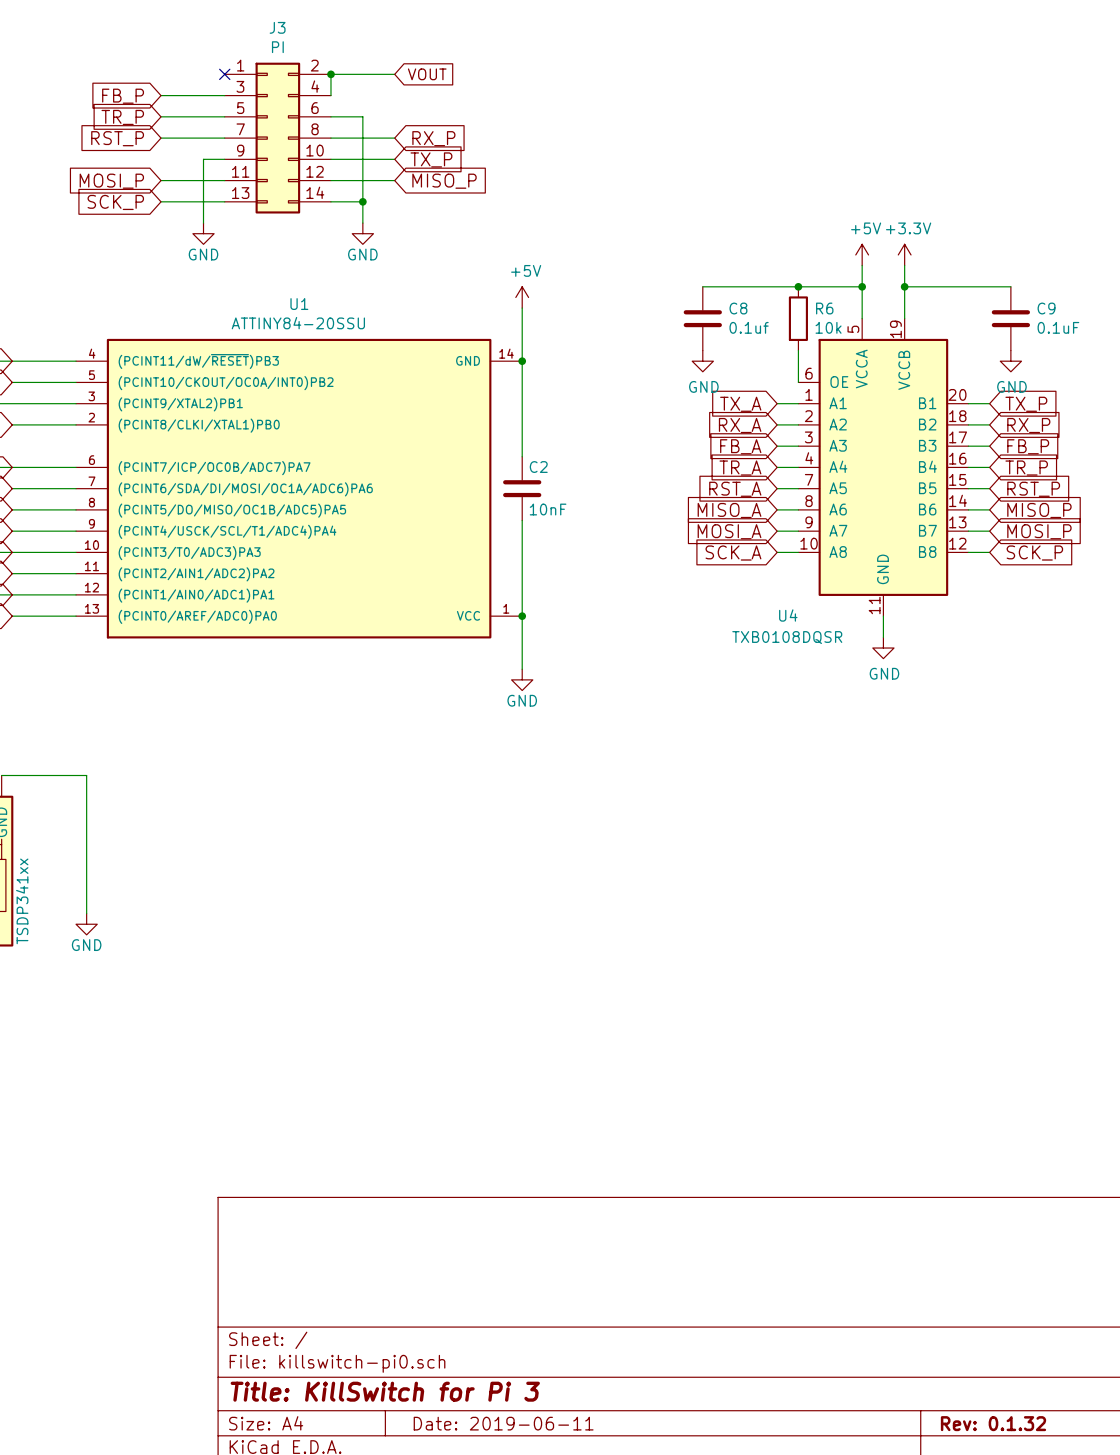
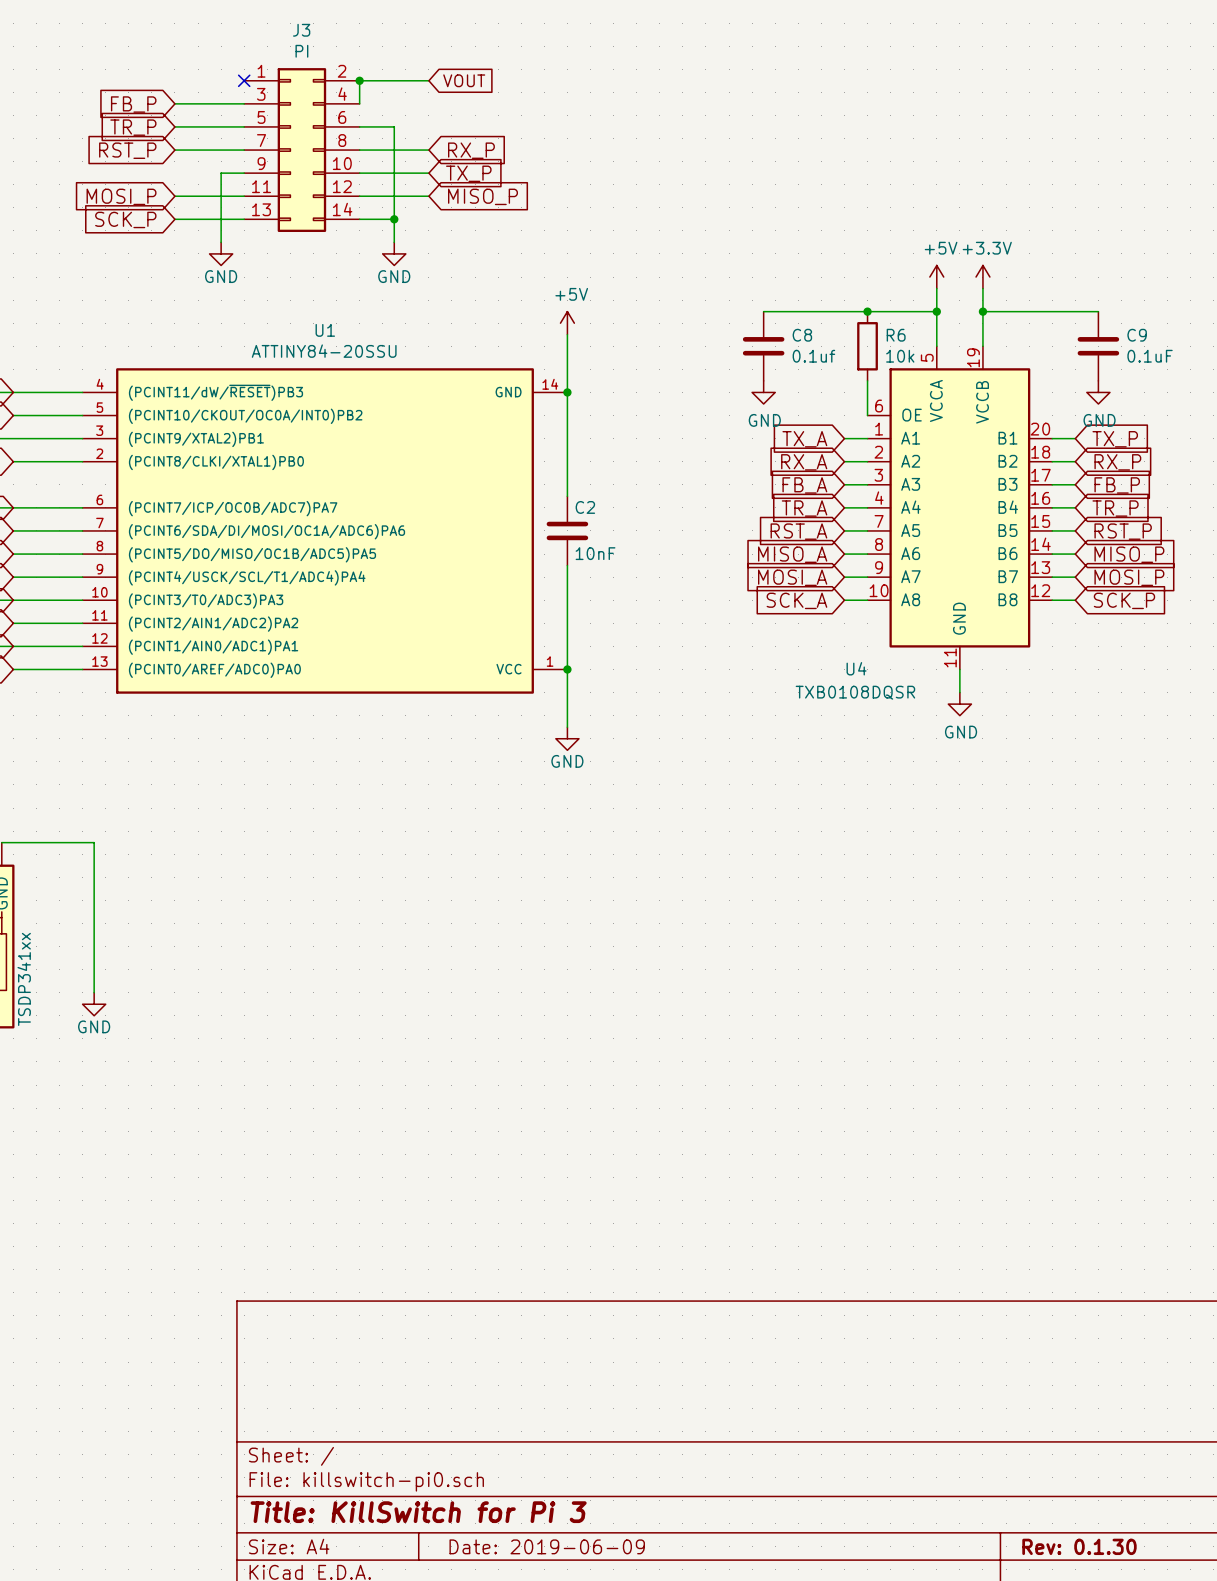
title block: Date: 2019-06-11 (503, 1423) -> Date: 2019-06-09 (547, 1546)
title block: Rev: 0.1.32 (993, 1423) -> Rev: 0.1.30 (1079, 1546)

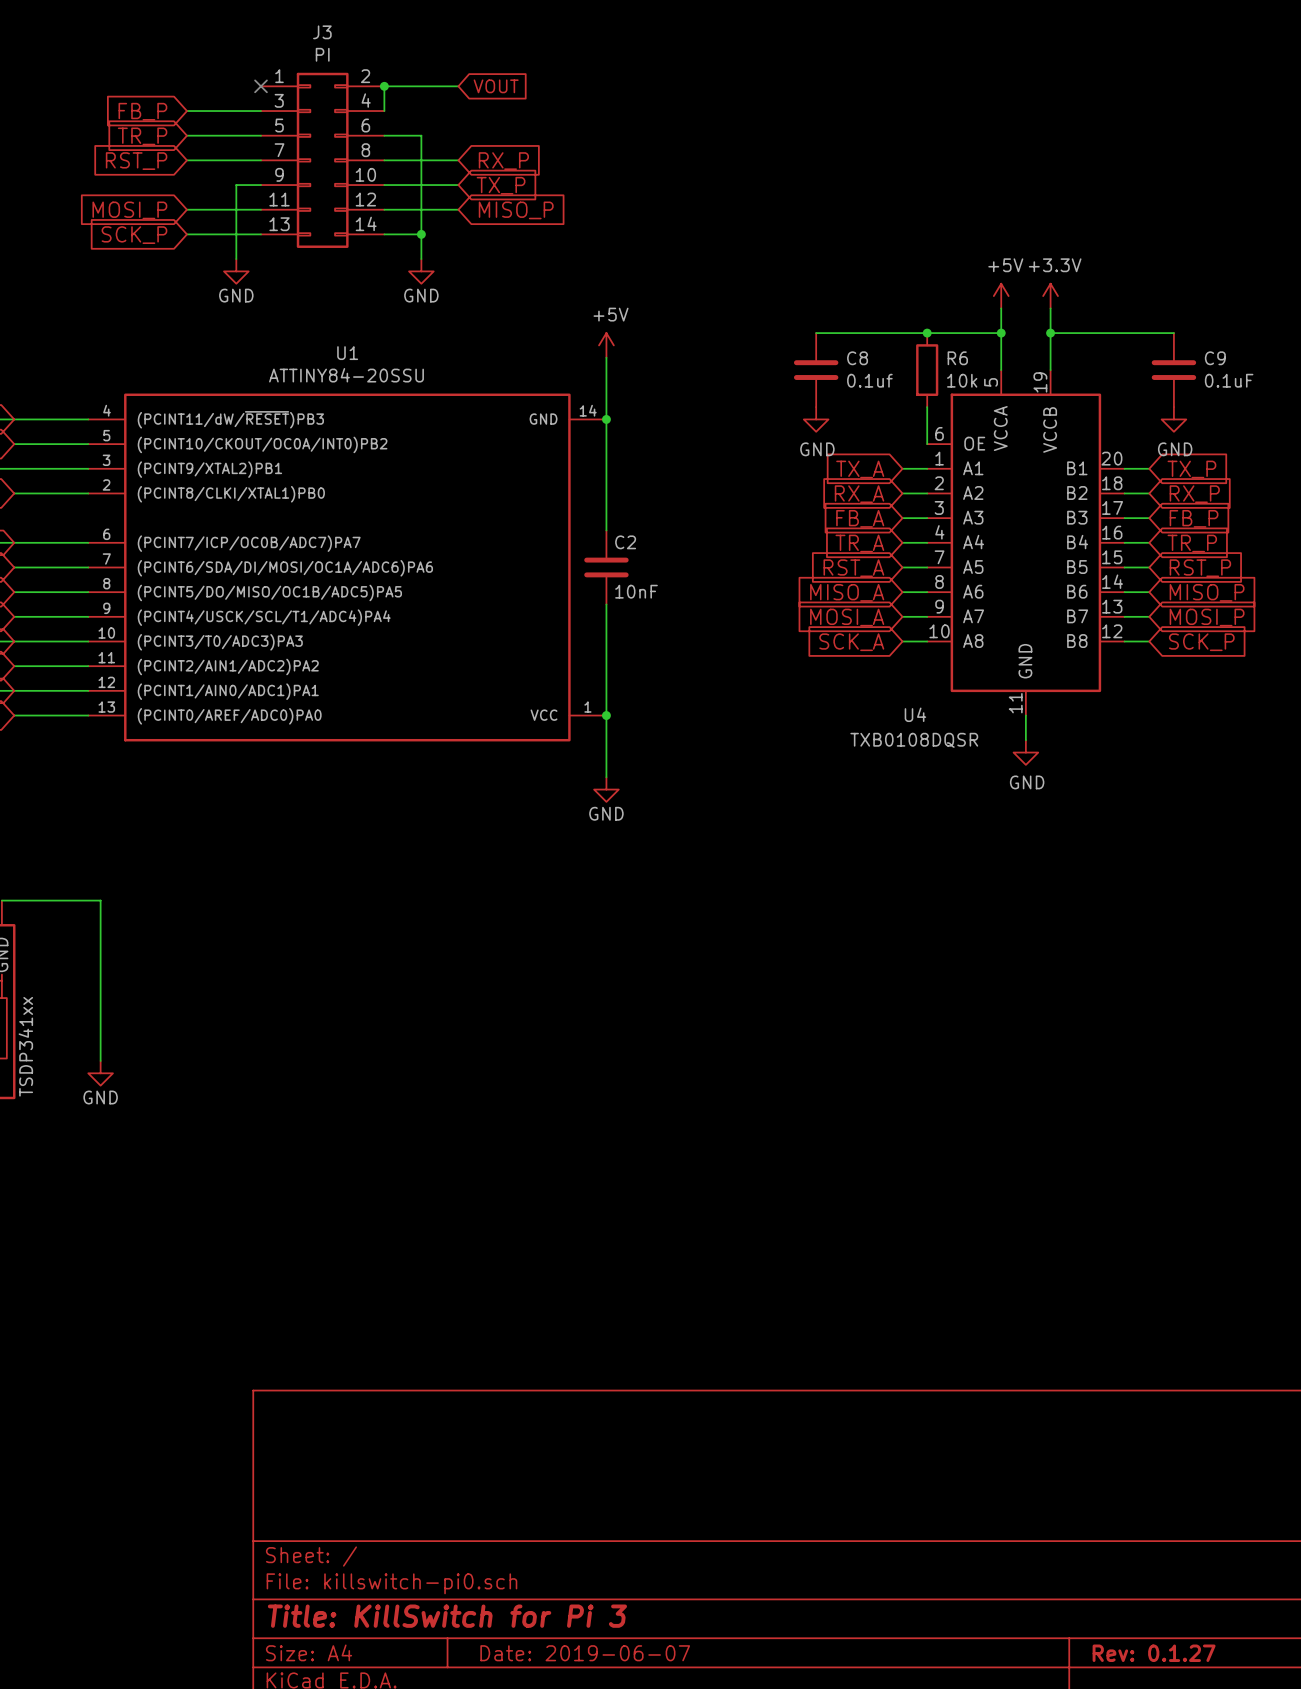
title block: Date: 2019-06-09 (547, 1546) -> Date: 2019-06-07 (585, 1653)
title block: Rev: 0.1.30 (1079, 1546) -> Rev: 0.1.27 (1154, 1653)

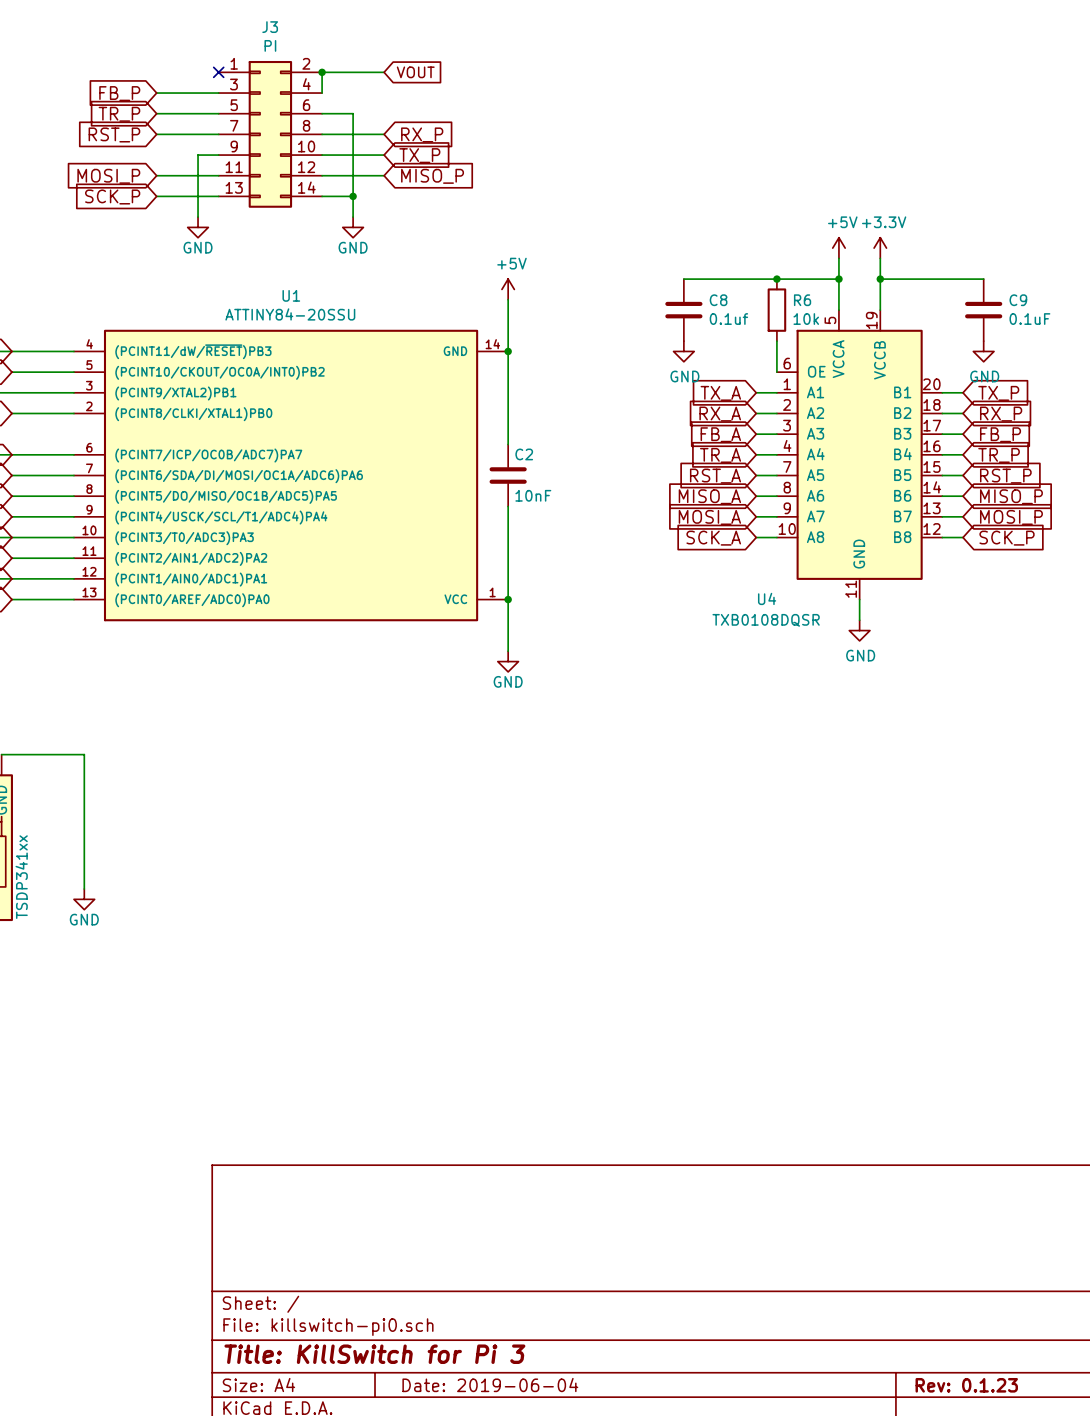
title block: Date: 2019-06-07 (585, 1653) -> Date: 2019-06-04 (490, 1385)
title block: Rev: 0.1.27 (1154, 1653) -> Rev: 0.1.23 (966, 1385)

